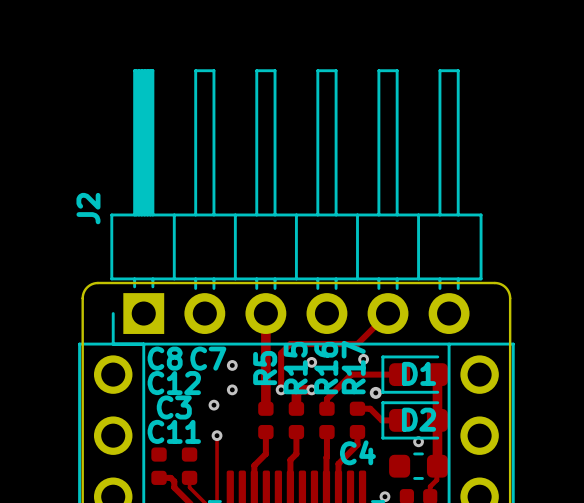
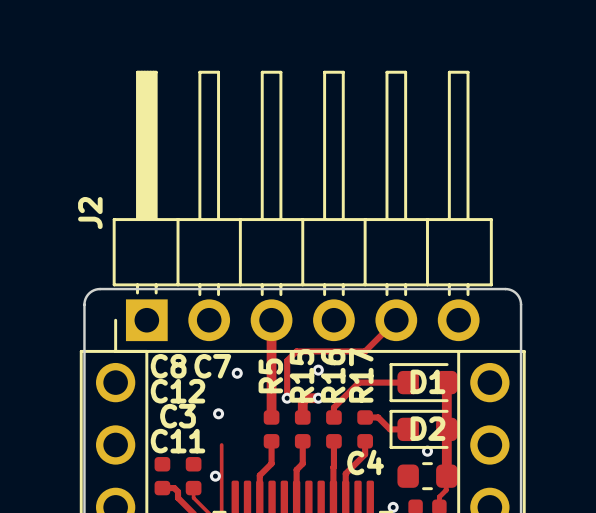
via: (363, 359) -> none
via: (232, 389) -> none
via: (375, 392) -> none
via position: (217, 435) -> (215, 476)

